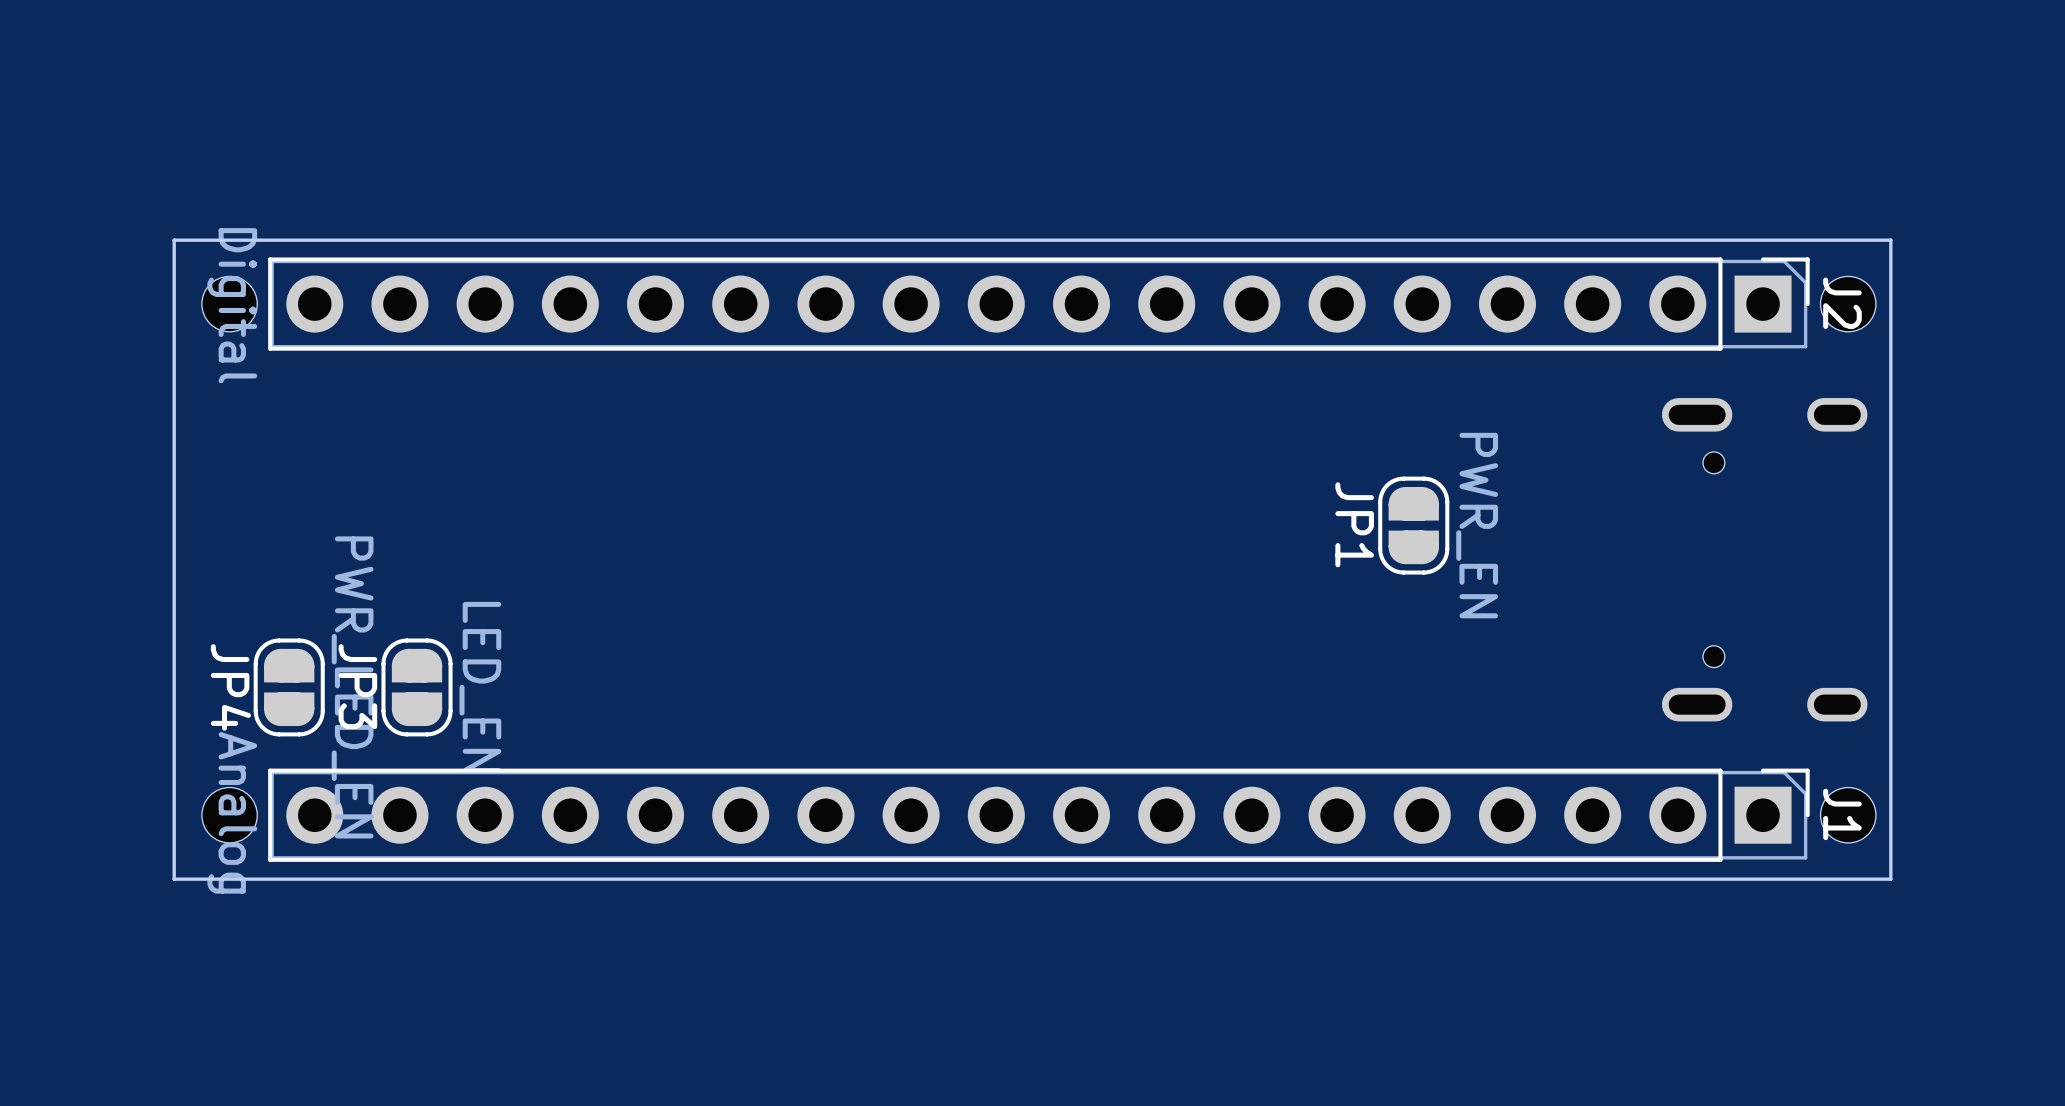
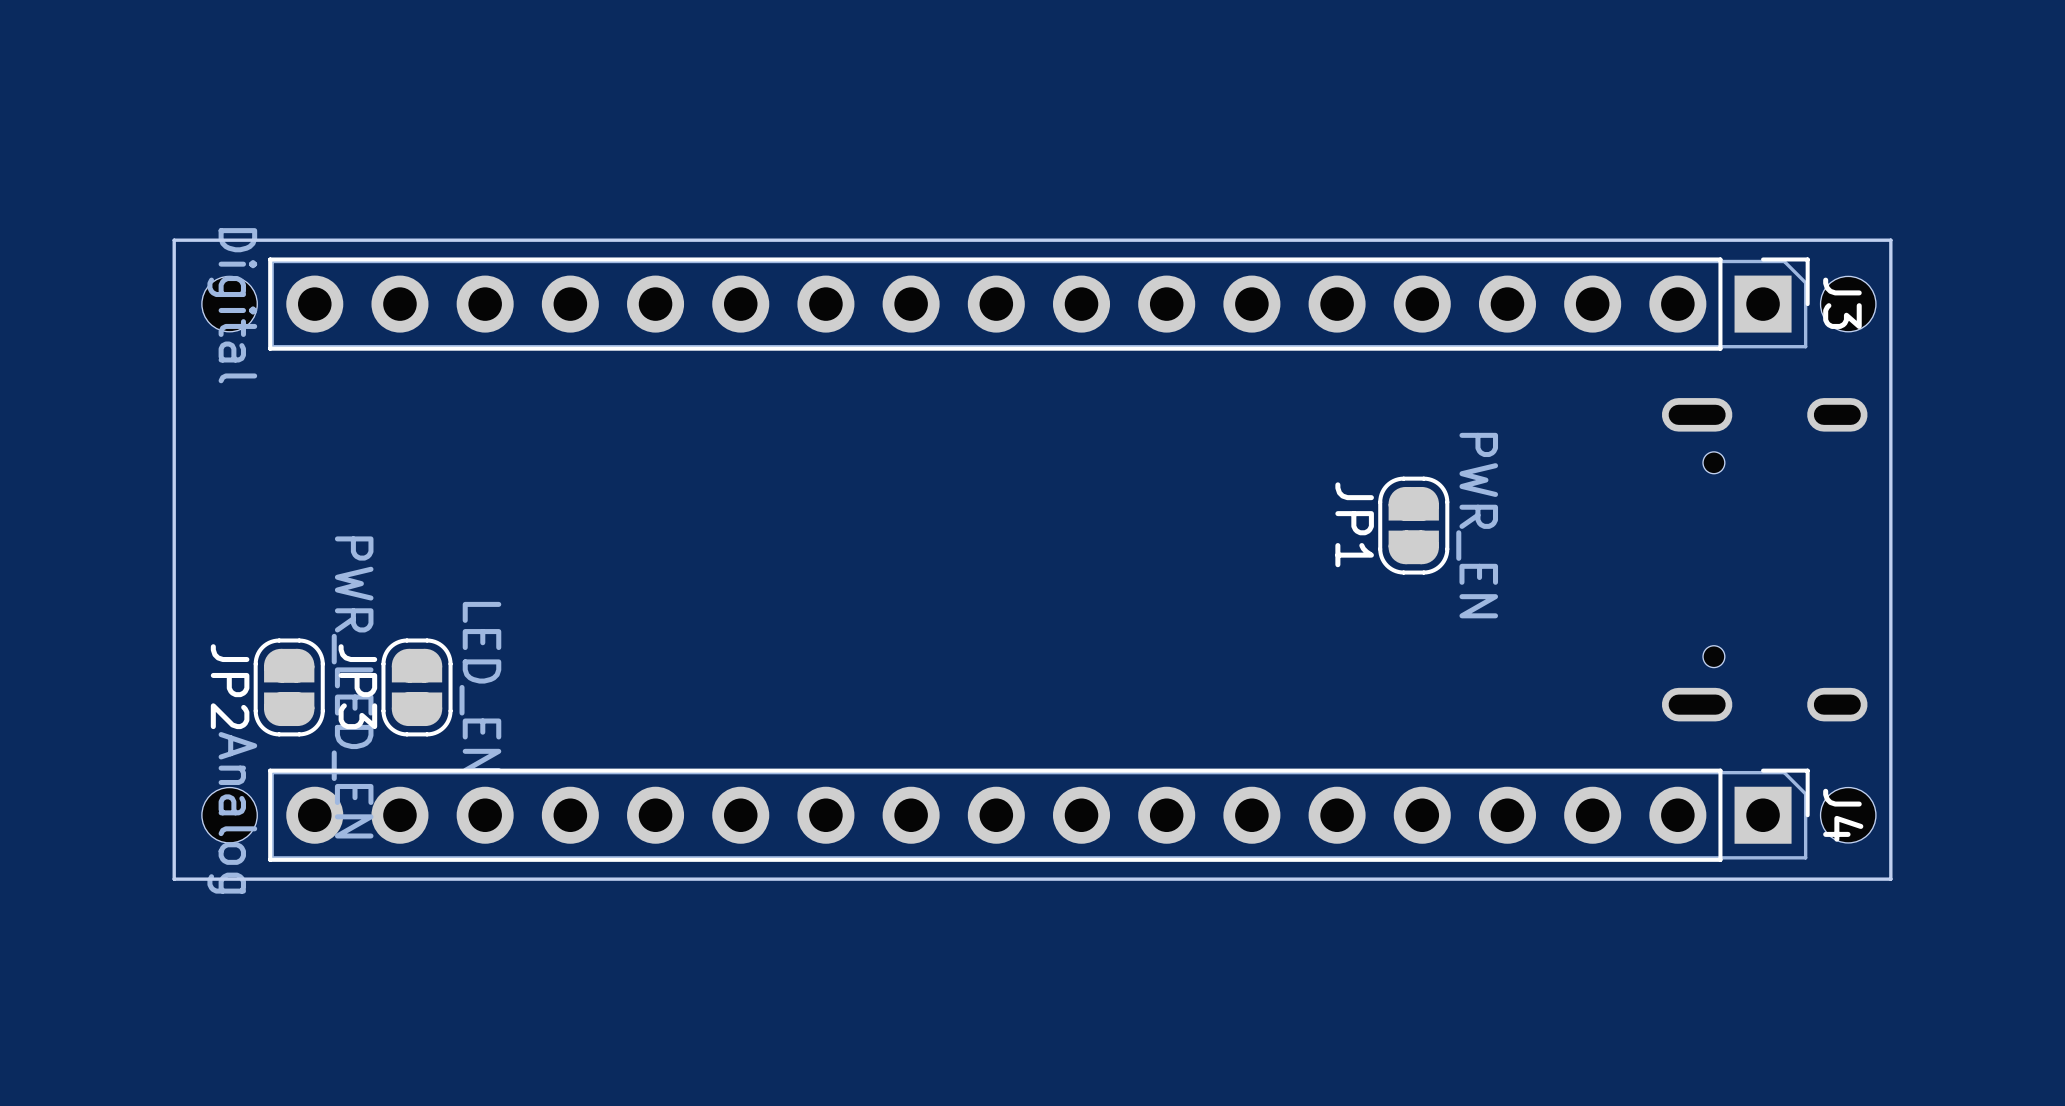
J2 name: J2 (1842, 303) -> J3 (1842, 303)
JP4 name: JP4 (230, 687) -> JP2 (230, 686)
J1 name: J1 (1842, 814) -> J4 (1843, 815)

